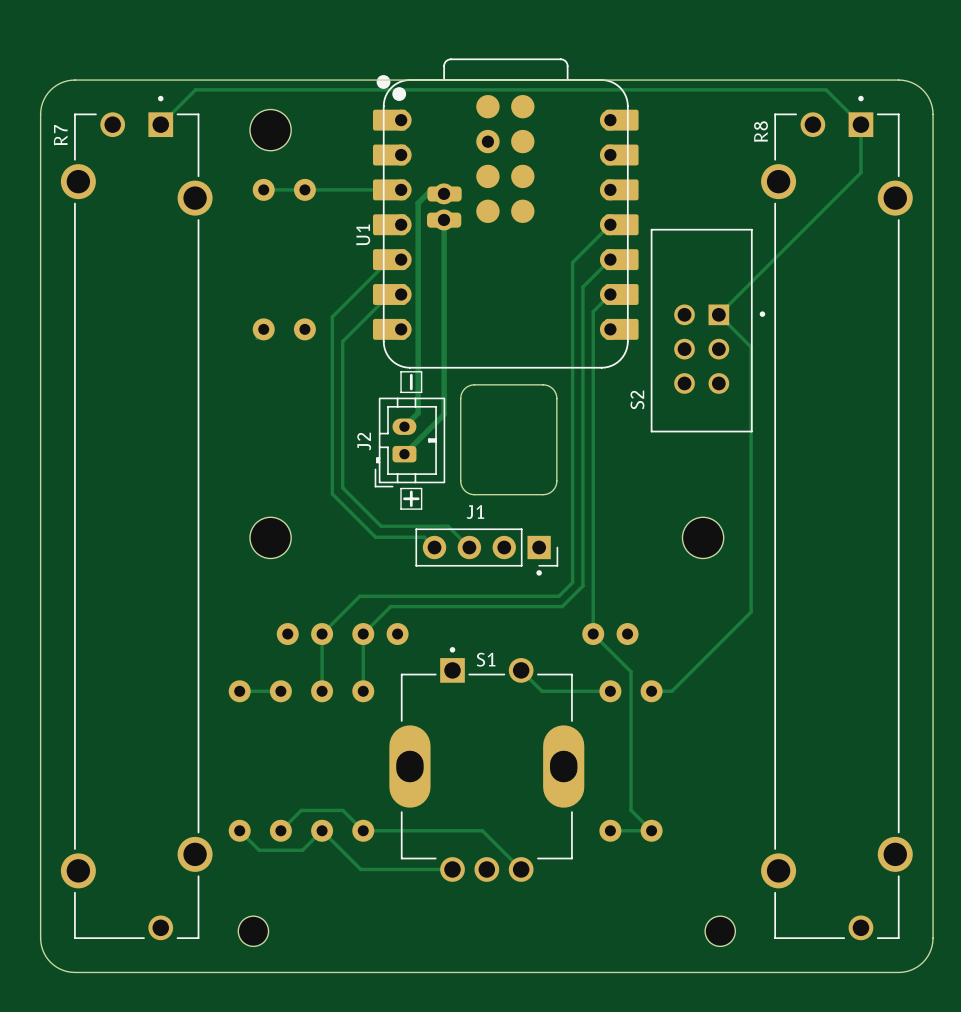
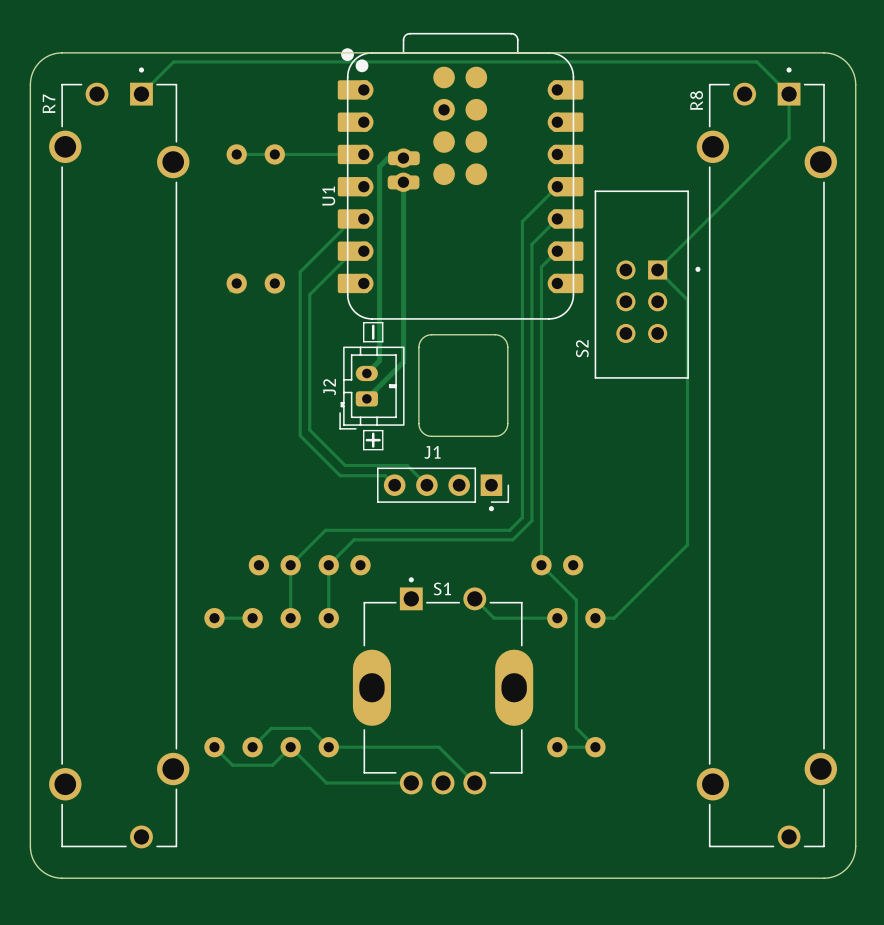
J1 footprint: [250, 109, 724, 576] -> [377, 467, 510, 512]
part: (253, 931) -> none
part: (720, 931) -> none

